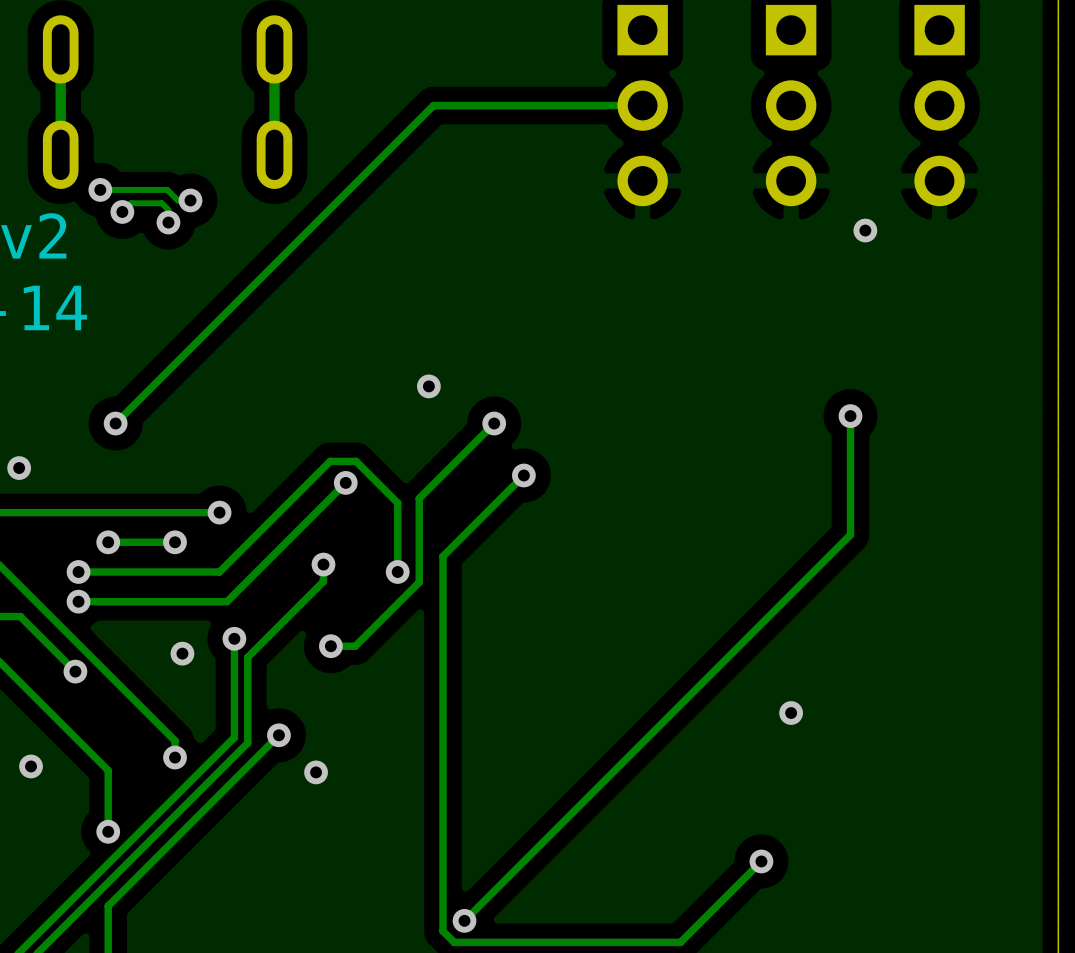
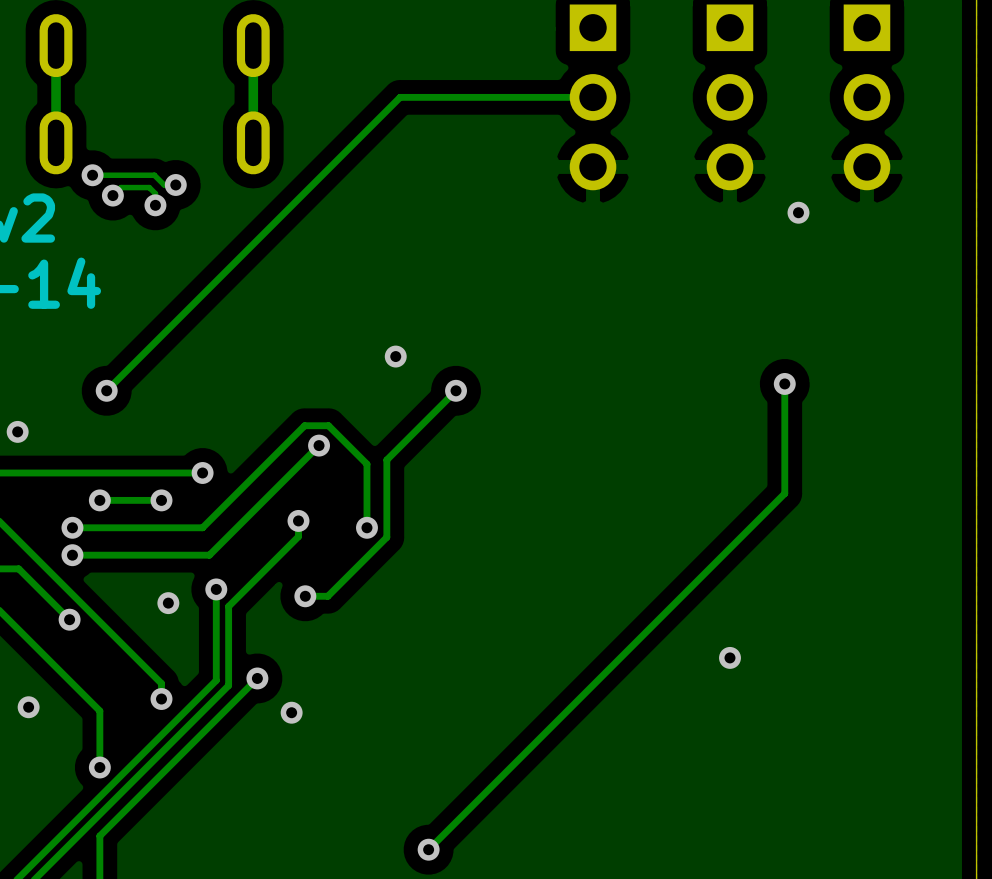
track: (523, 475) (442, 556) (442, 931) (454, 942) (680, 942) (761, 861) -> none
via: (523, 475) -> none
via: (761, 861) -> none

